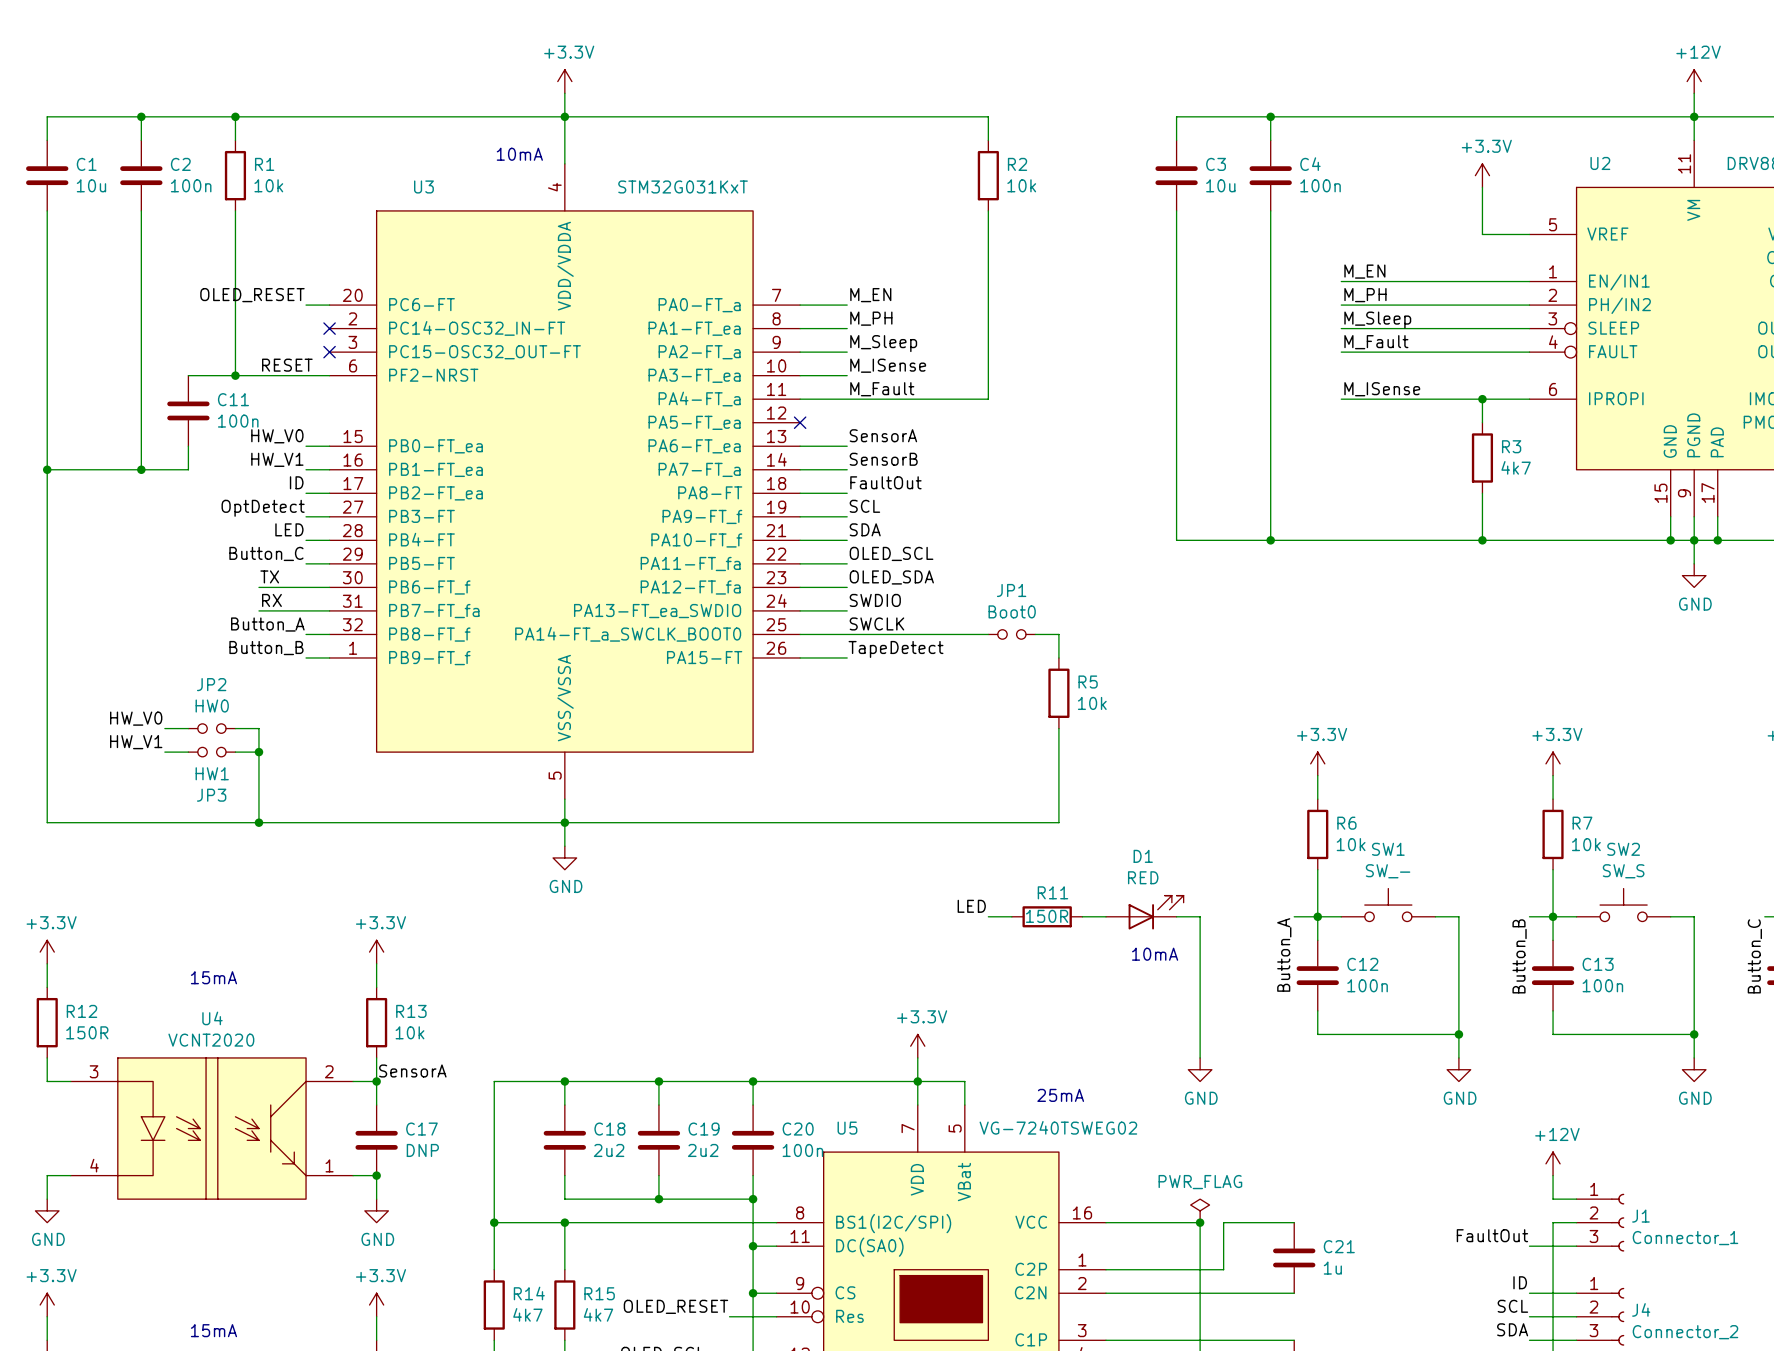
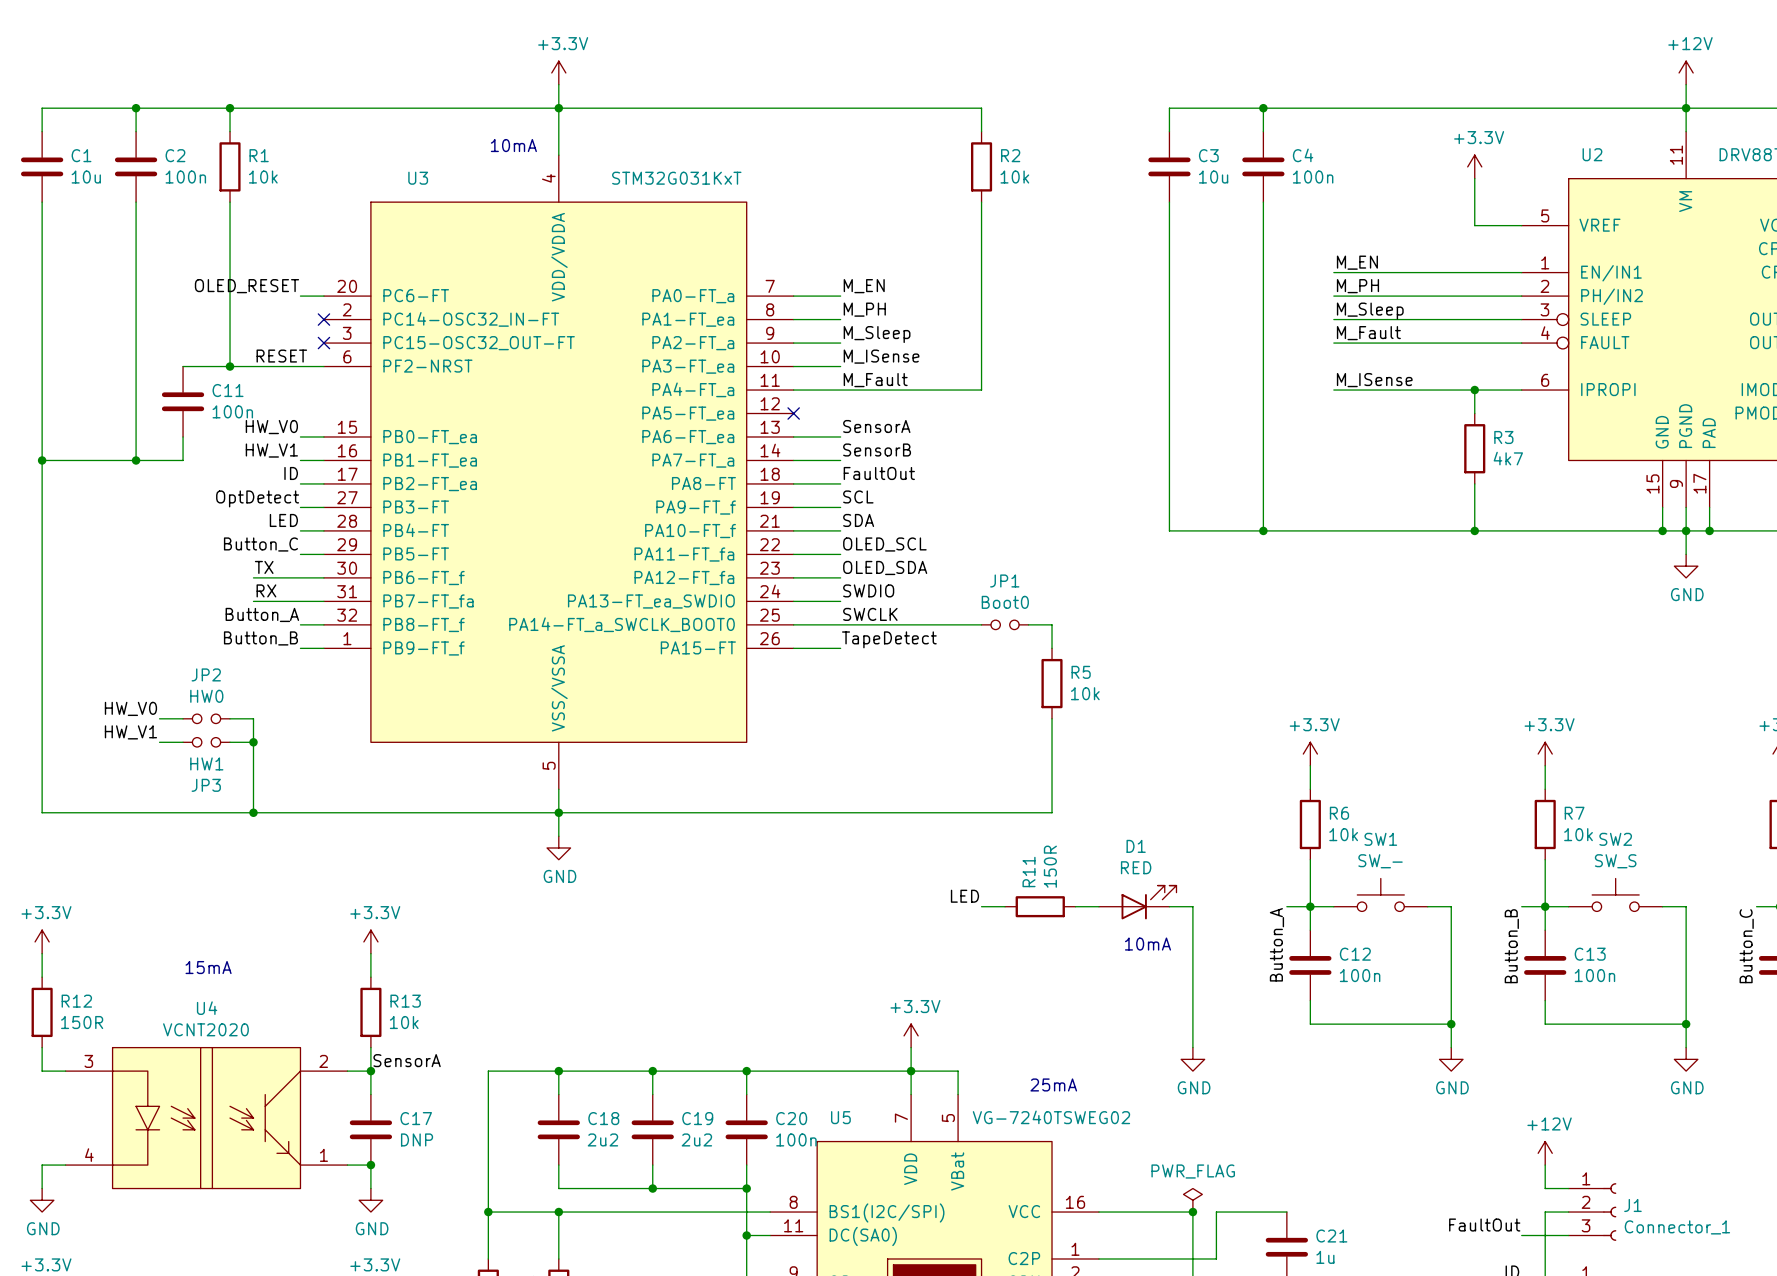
R11 name rotation: 0° (1052, 892) -> 90° counterclockwise (1029, 872)
R11 value rotation: 0° (1047, 916) -> 90° counterclockwise (1050, 866)

